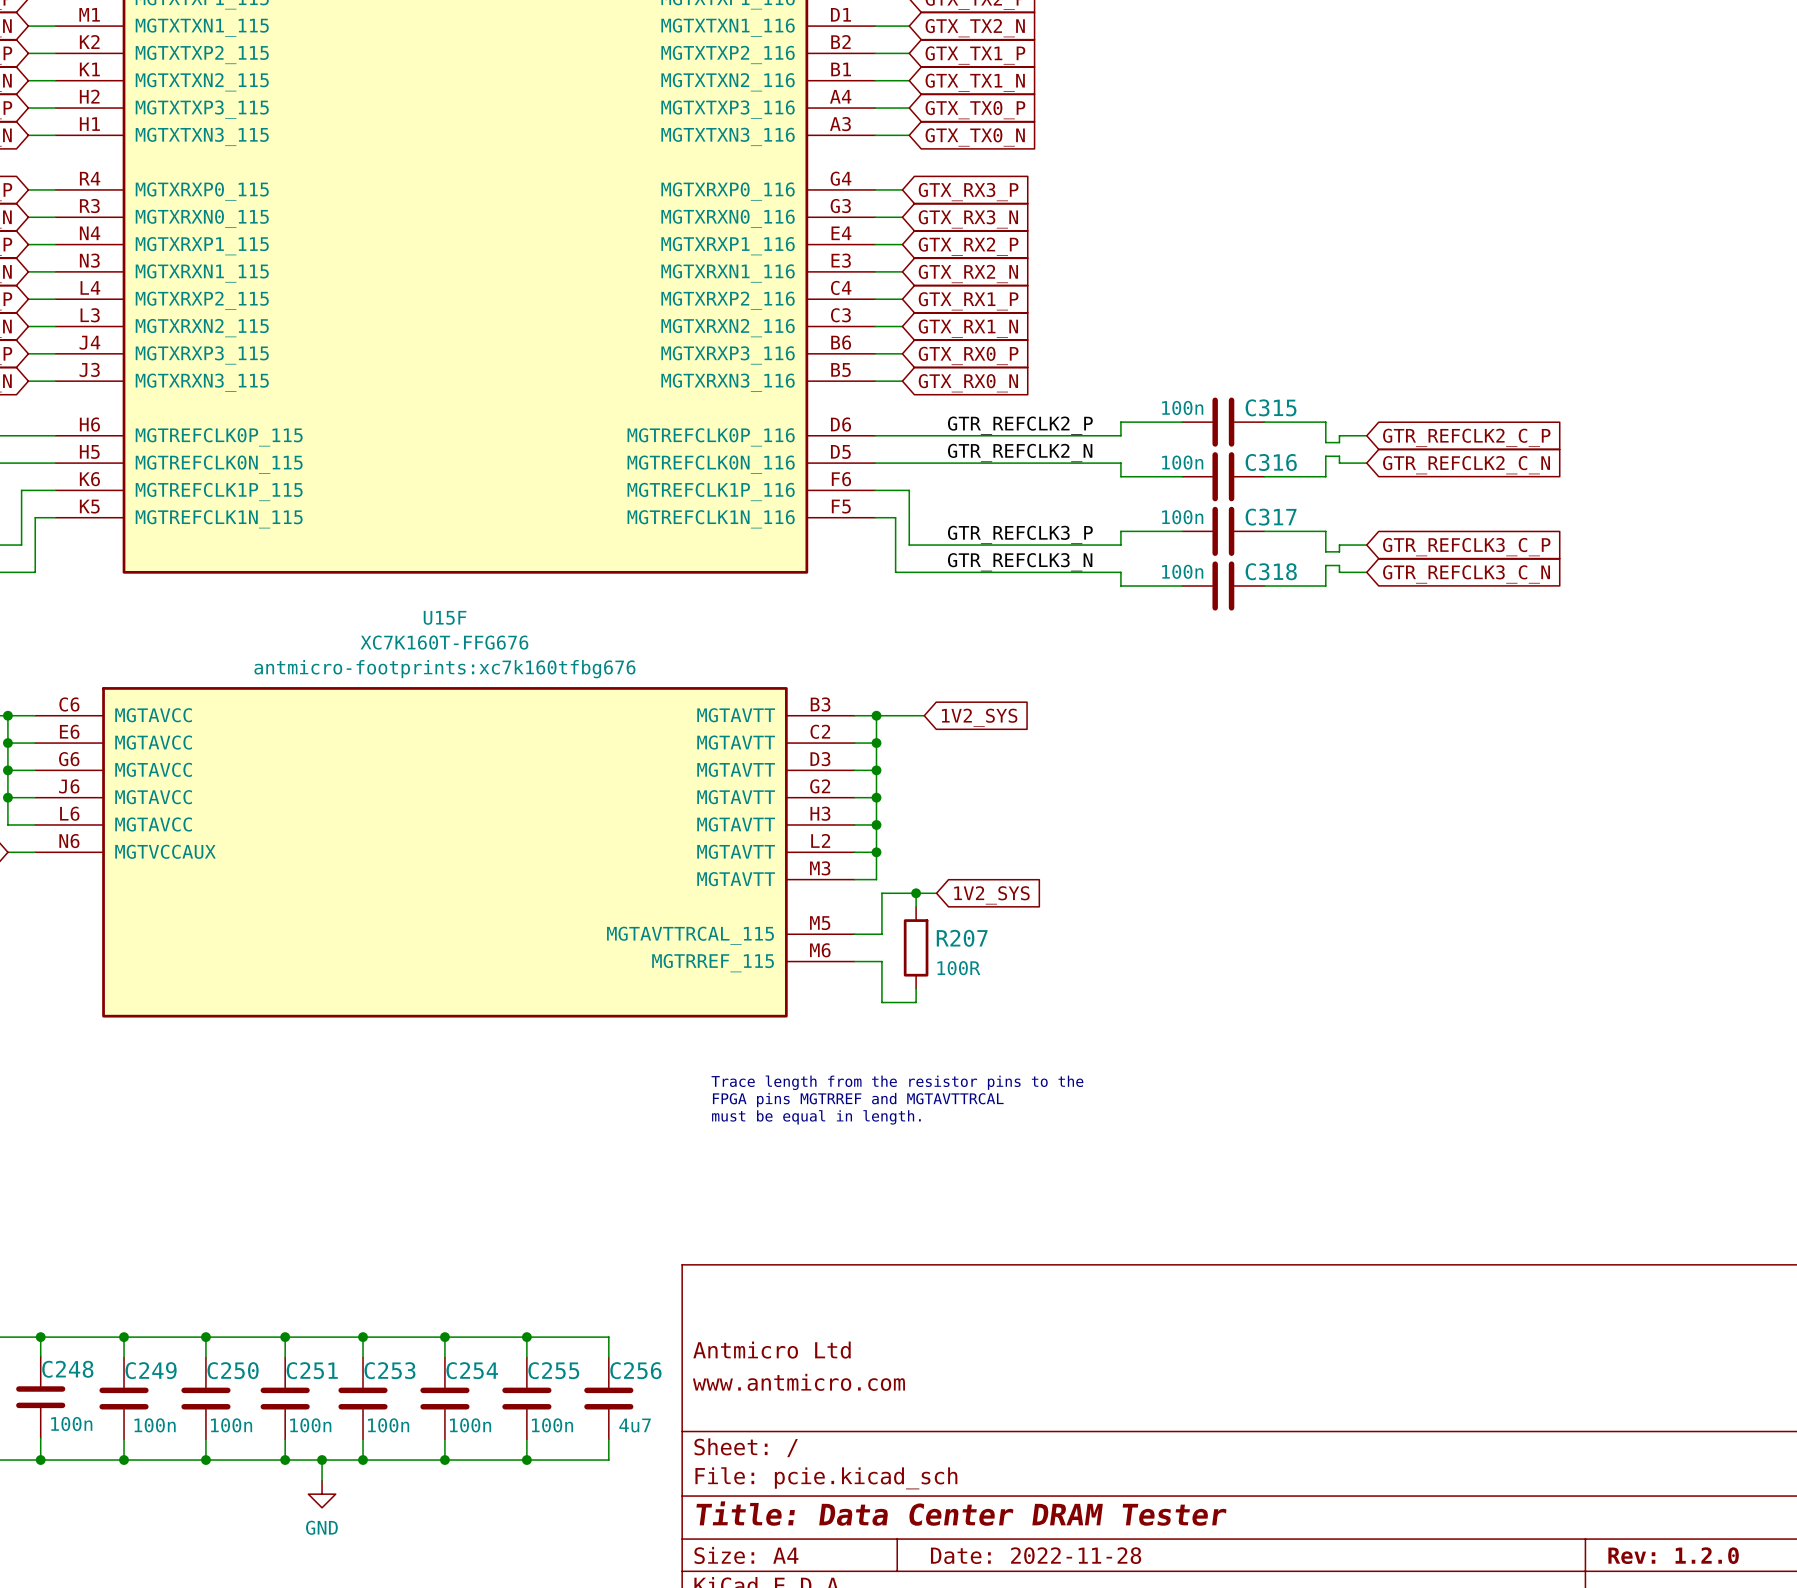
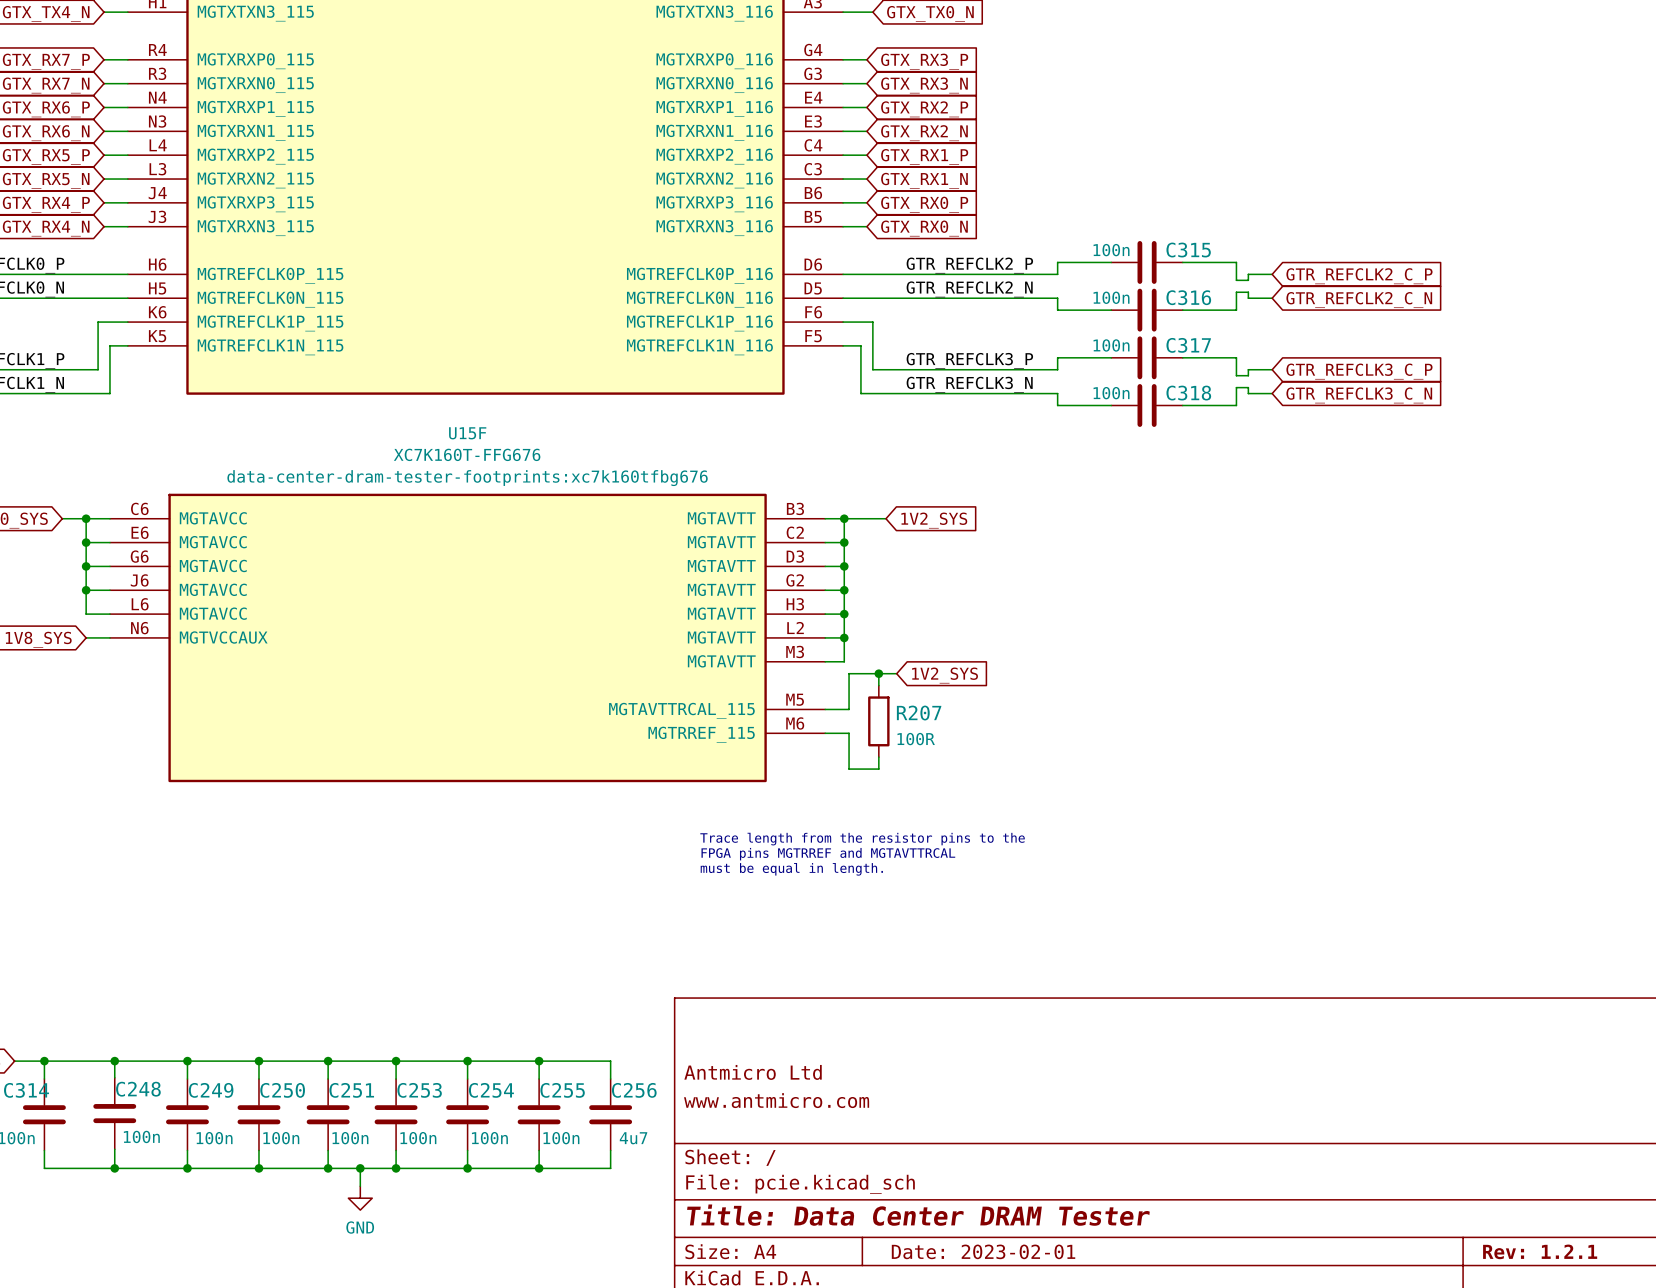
U15F text: antmicro-footprints:xc7k160tfbg676 (444, 669) -> data-center-dram-tester-footprints:xc7k160tfbg676 (467, 478)
title block: Date: 2022-11-28 (1036, 1555) -> Date: 2023-02-01 (983, 1251)
title block: Rev: 1.2.0 (1673, 1555) -> Rev: 1.2.1 (1540, 1251)

